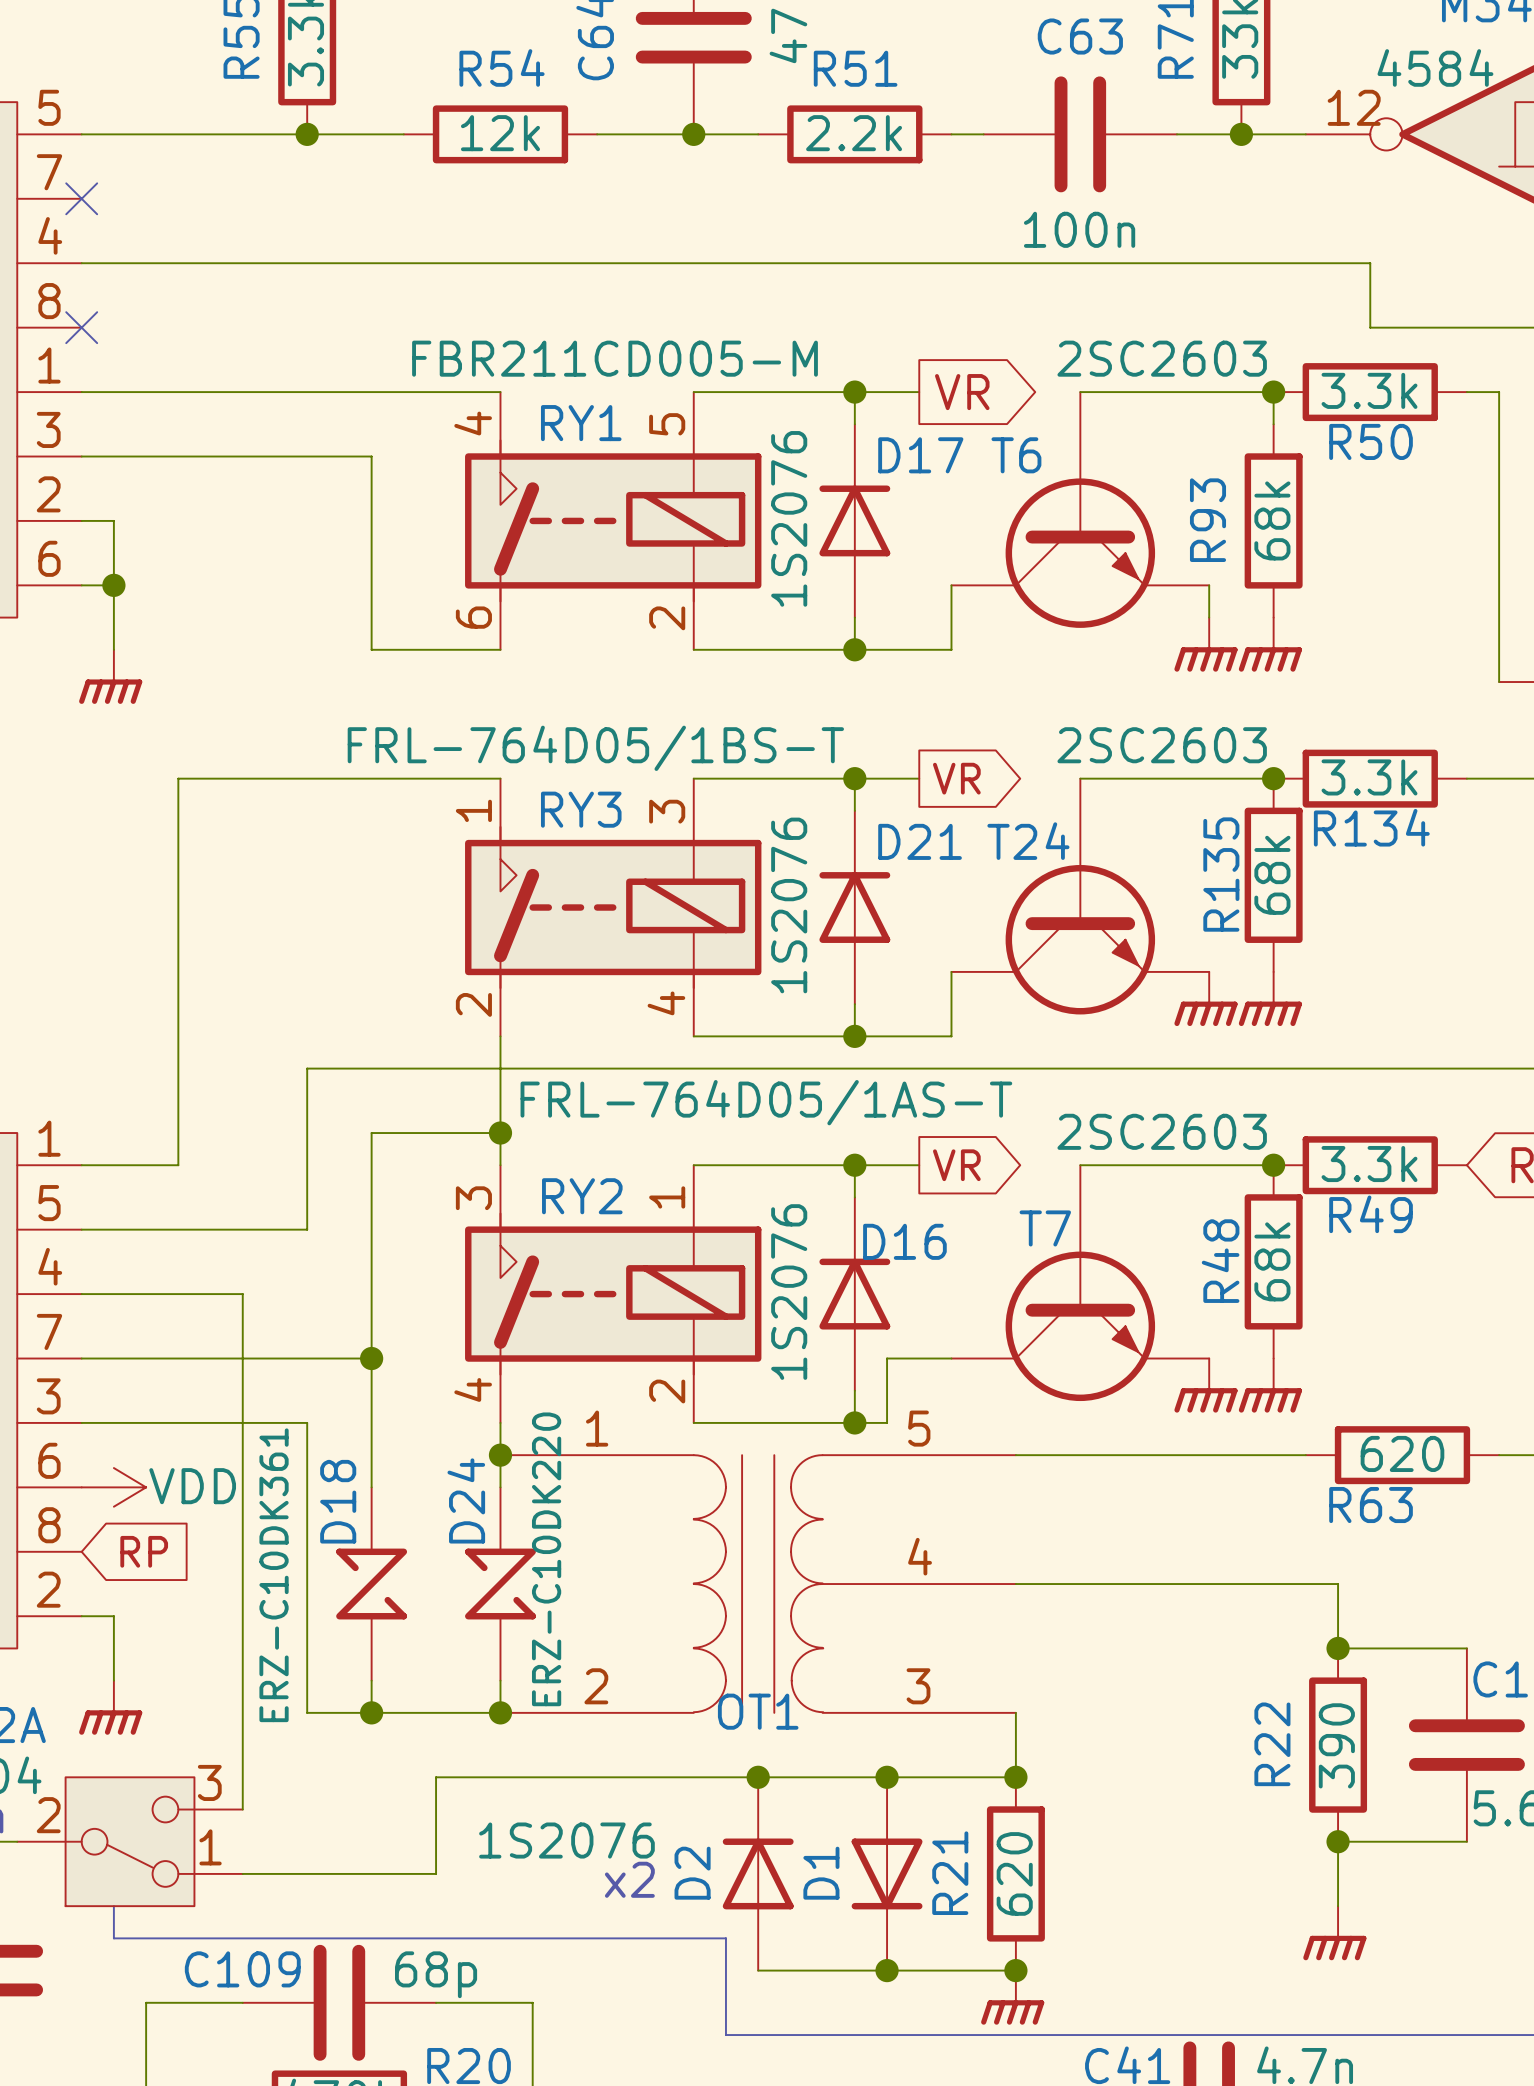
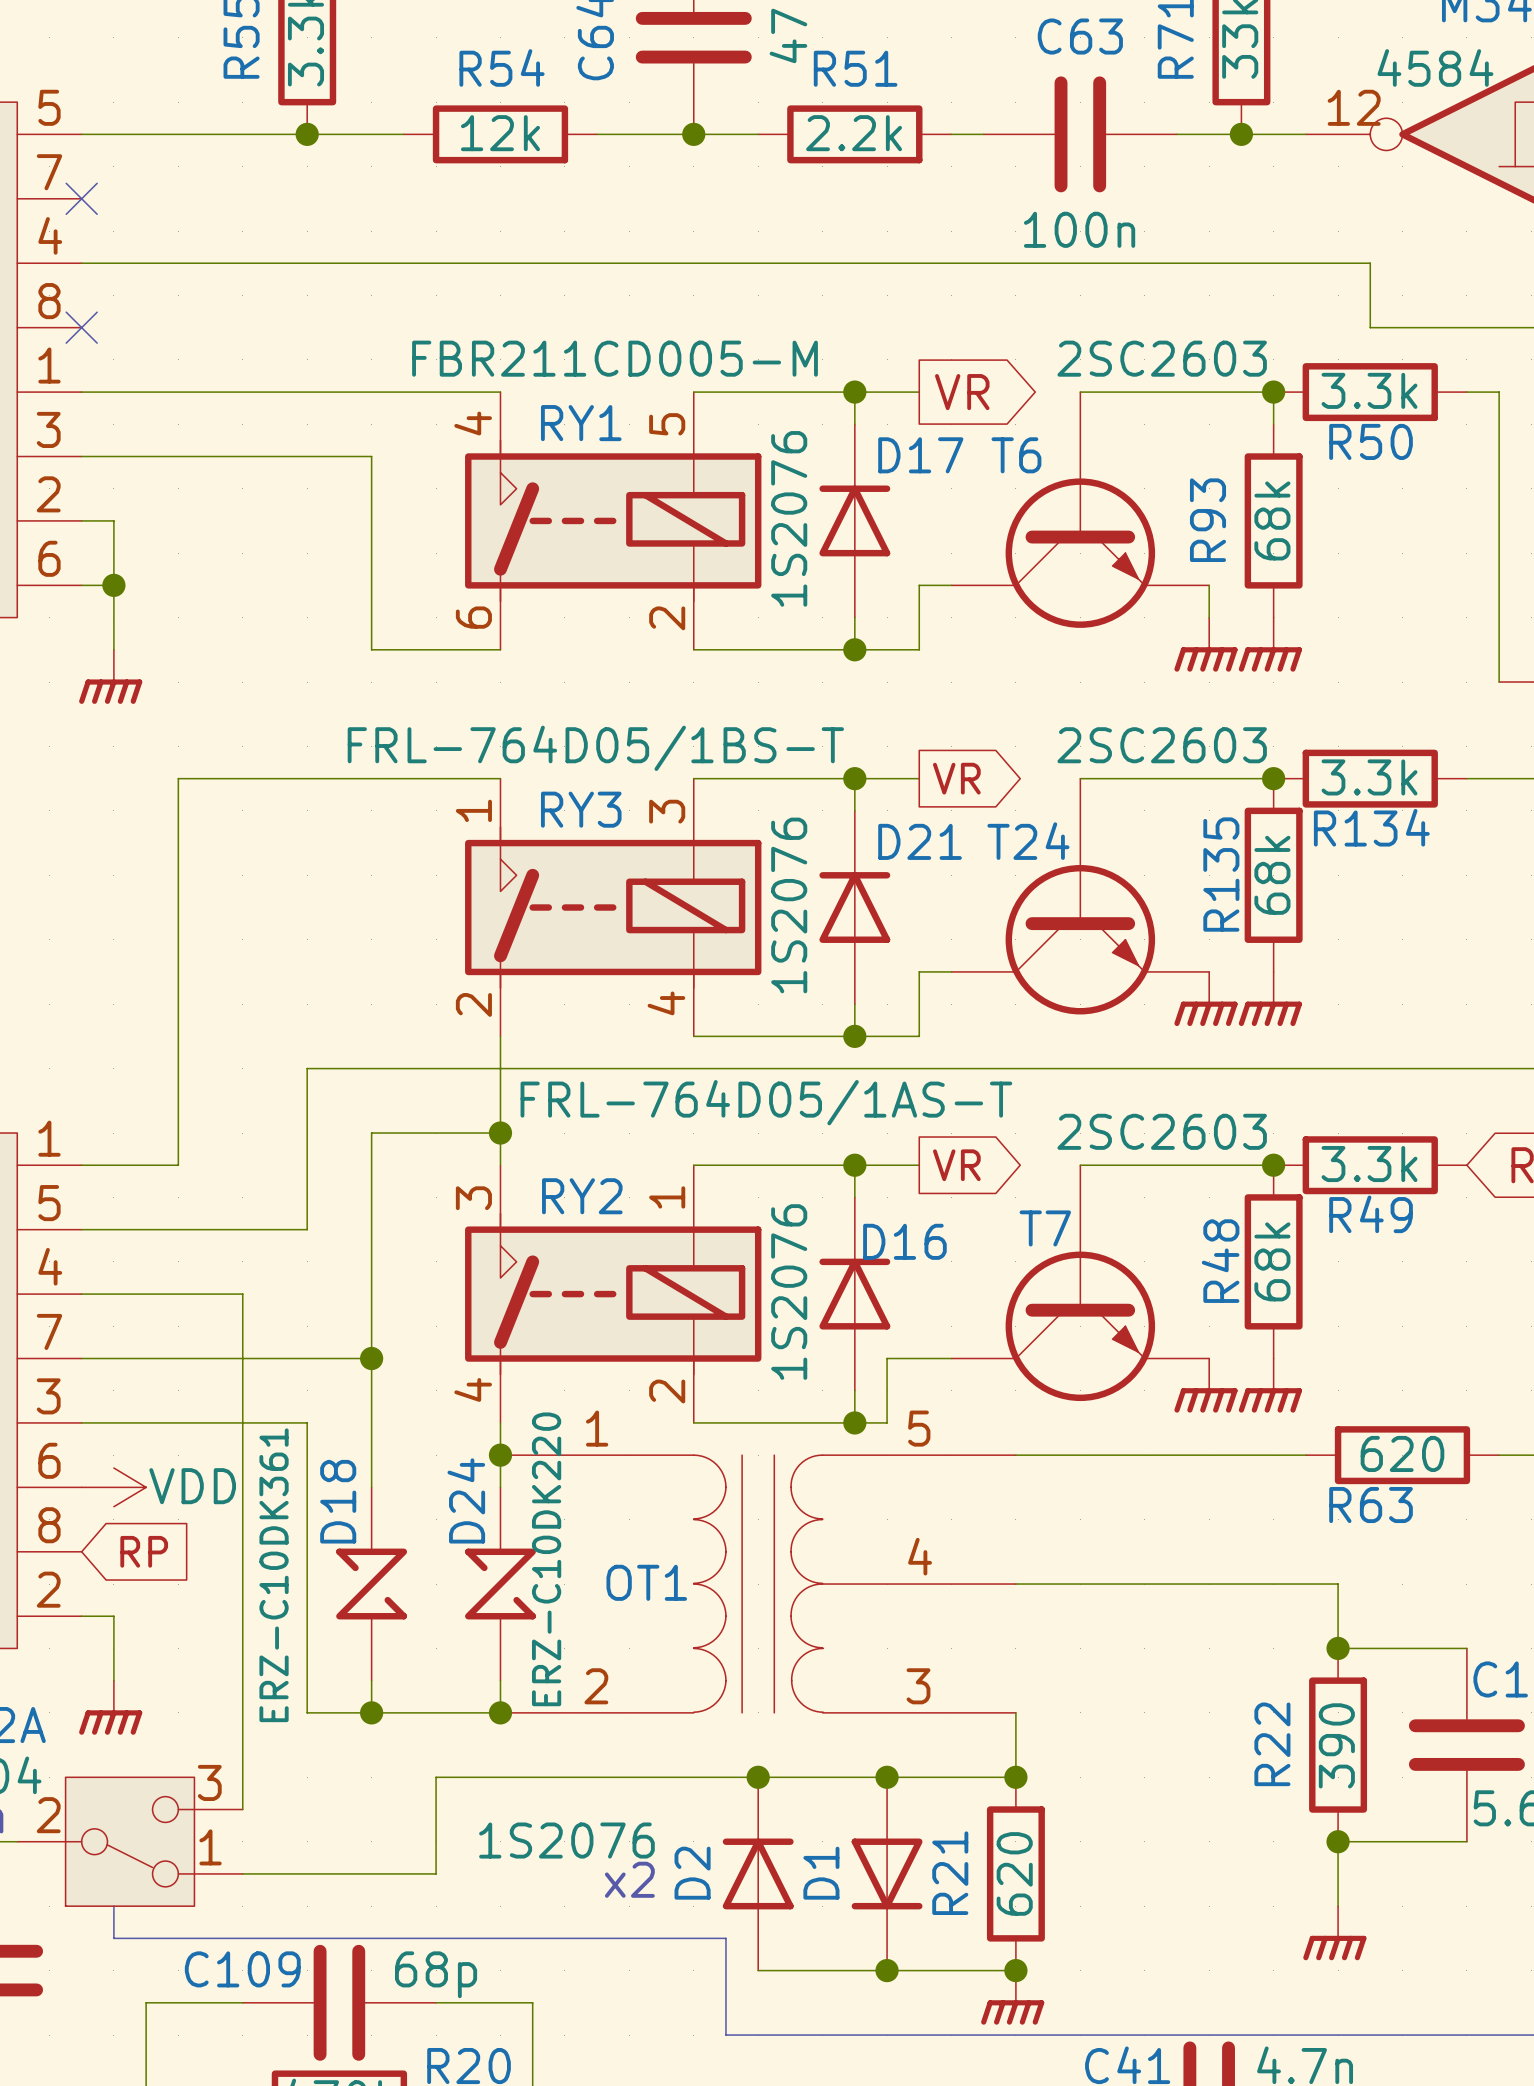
wire: (951, 585) (951, 649) (919, 649) -> (951, 585) (919, 585) (919, 649)
wire: (951, 971) (951, 1036) (919, 1036) -> (951, 971) (919, 971) (919, 1036)
OT1 name position: OT1 (758, 1711) -> OT1 (646, 1582)

